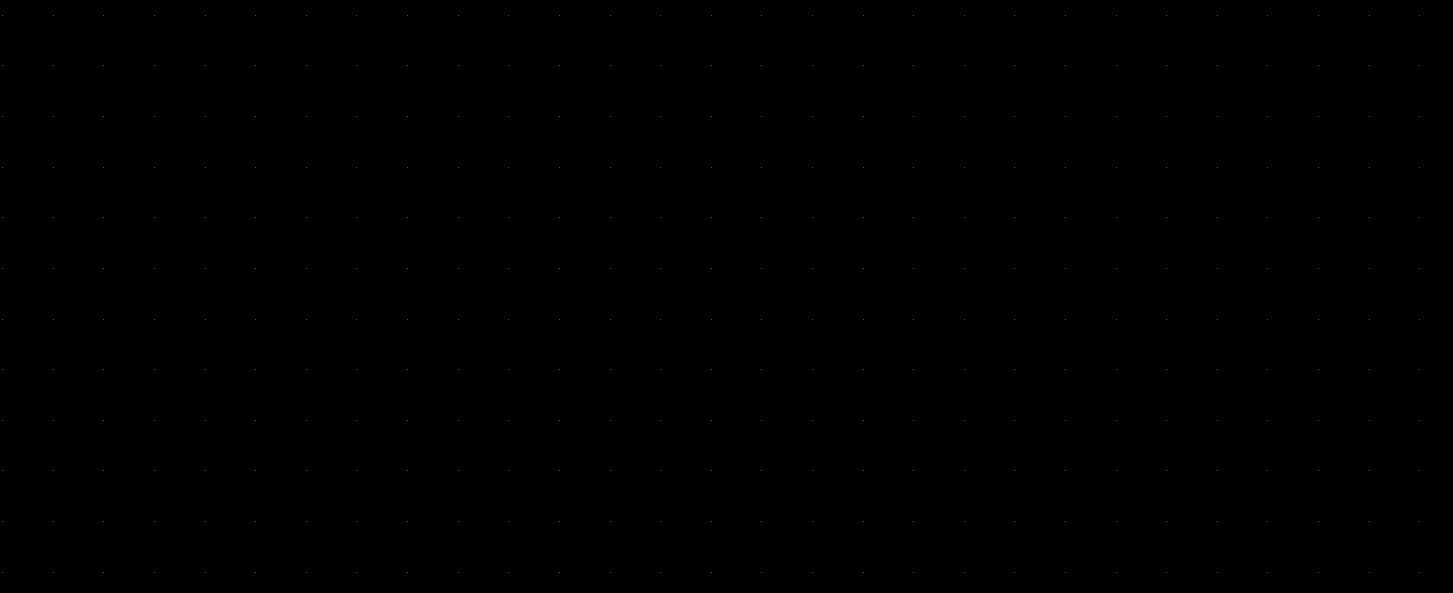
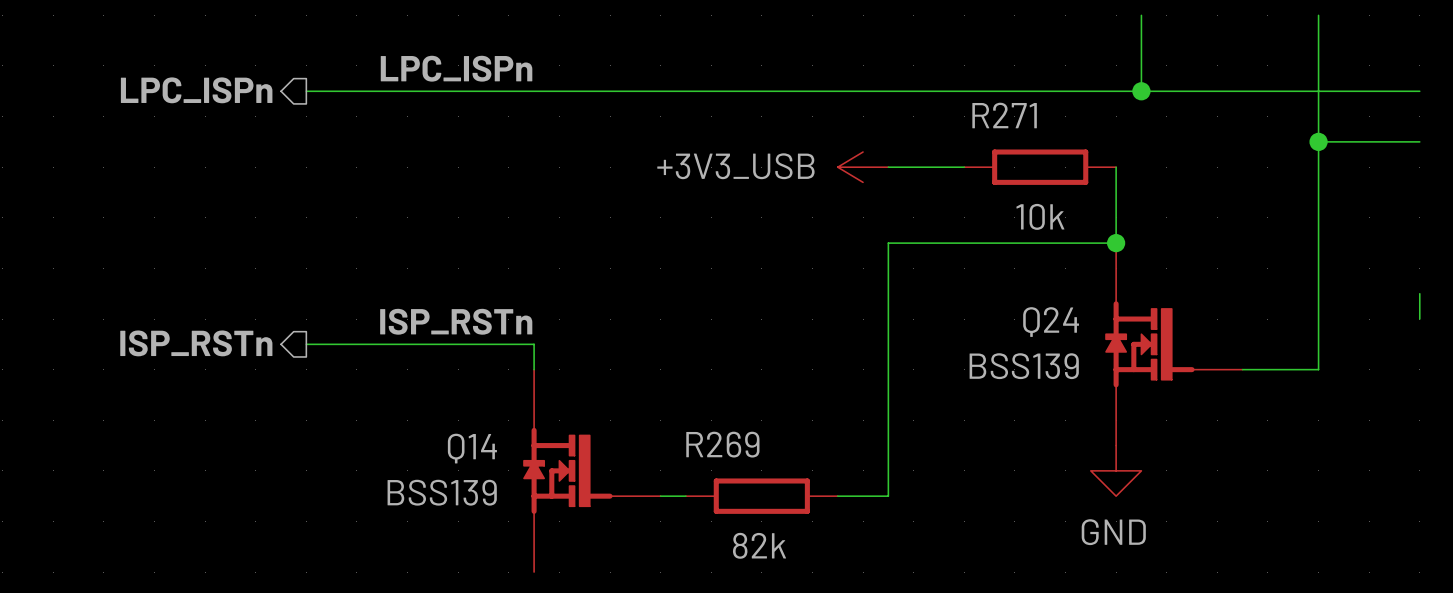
wire: none -> (1141, 15) (1141, 91)
wire: none -> (1318, 15) (1318, 369) (1242, 369)
label: none -> LPC_ISPn (456, 68)
hierarchical label: none -> LPC_ISPn (196, 90)
wire: none -> (306, 91) (1419, 91)
junction: none -> (1141, 91)
wire: none -> (1318, 141) (1419, 141)
junction: none -> (1318, 141)
power symbol: none -> +3V3_USB (863, 167)
wire: none -> (888, 167) (964, 167)
R271: none -> (1040, 167)
wire: none -> (1116, 167) (1116, 243) (888, 243) (888, 496) (837, 496)
junction: none -> (1116, 243)
wire: none -> (1419, 293) (1419, 319)
label: none -> ISP_RSTn (456, 321)
hierarchical label: none -> ISP_RSTn (196, 343)
wire: none -> (306, 344) (534, 344) (534, 369)
Q24: none -> BSS139 (1167, 344)
Q14: none -> BSS139 (585, 470)
power symbol: none -> GND (1116, 470)
wire: none -> (660, 496) (685, 496)
R269: none -> (761, 496)

